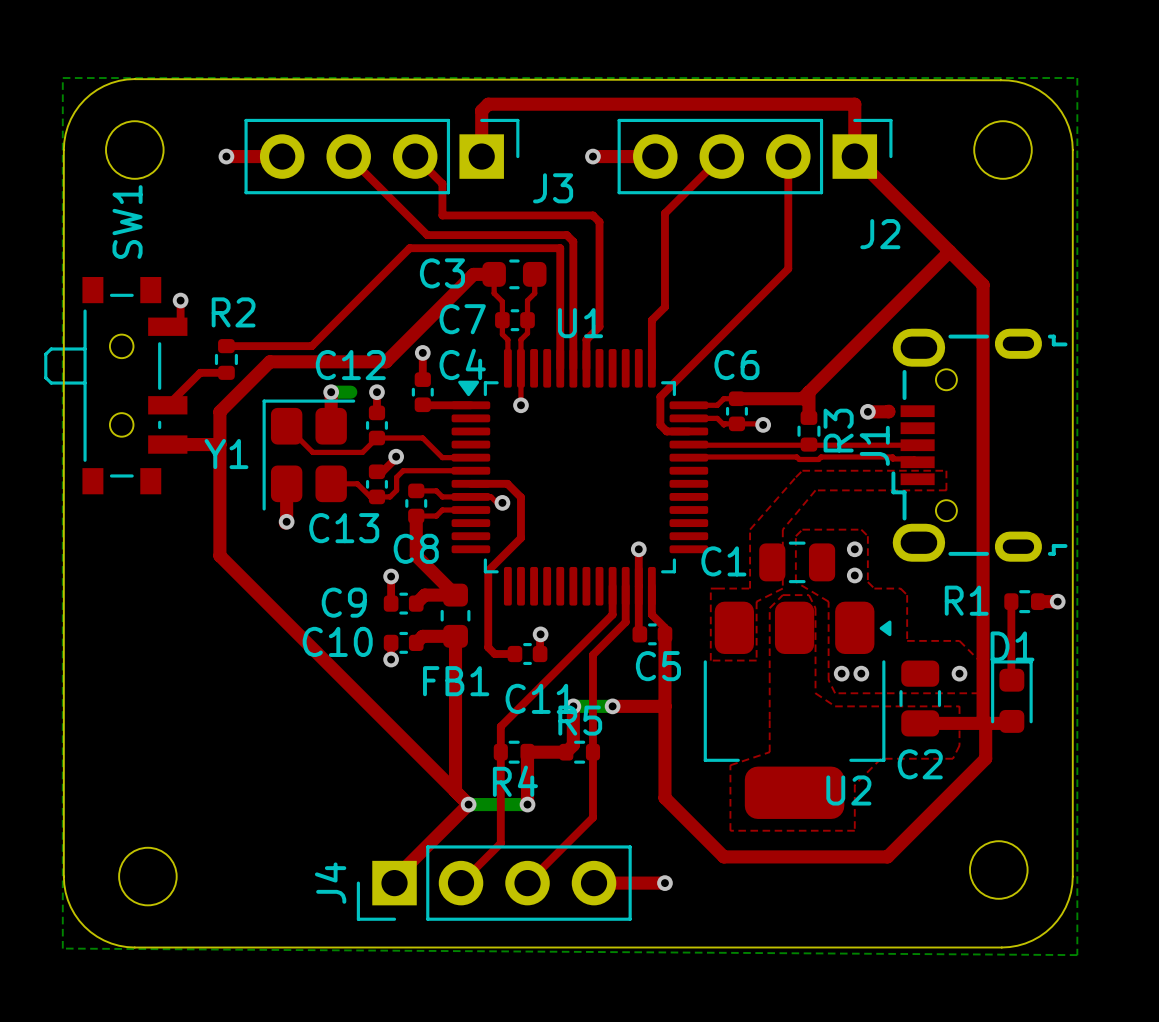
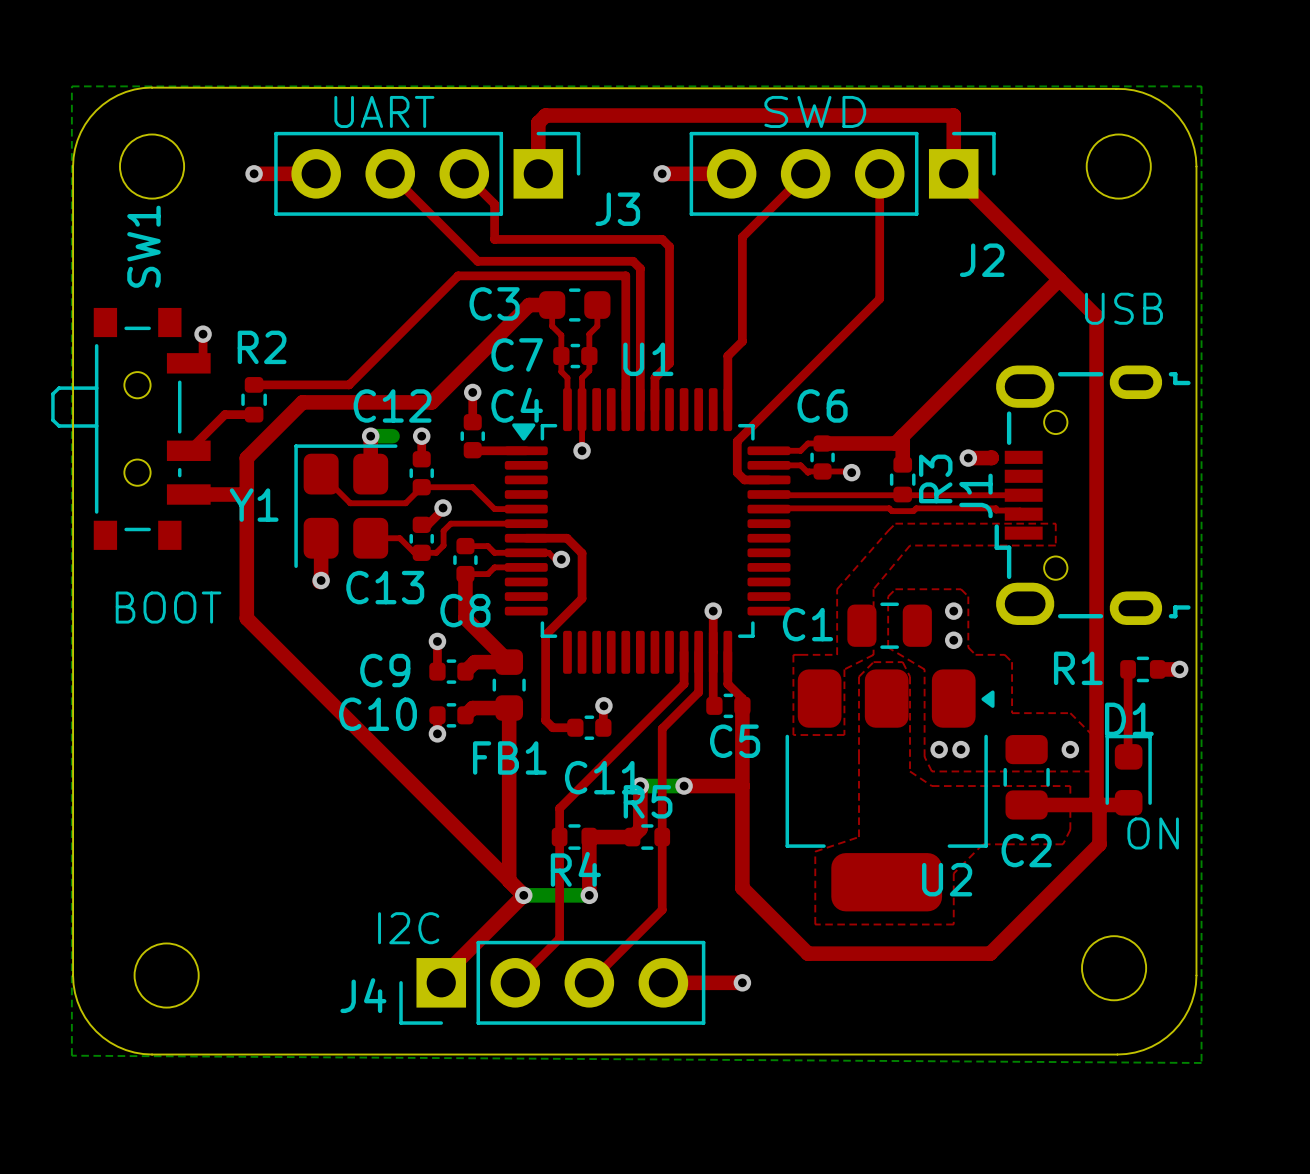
text: none -> UART (384, 111)
text: none -> SWD (815, 111)
text: none -> USB (1123, 308)
text: none -> BOOT (168, 607)
text: none -> ON (1153, 833)
text: none -> I2C (408, 928)
J4 name rotation: 0° (330, 883) -> 90° clockwise (363, 995)

